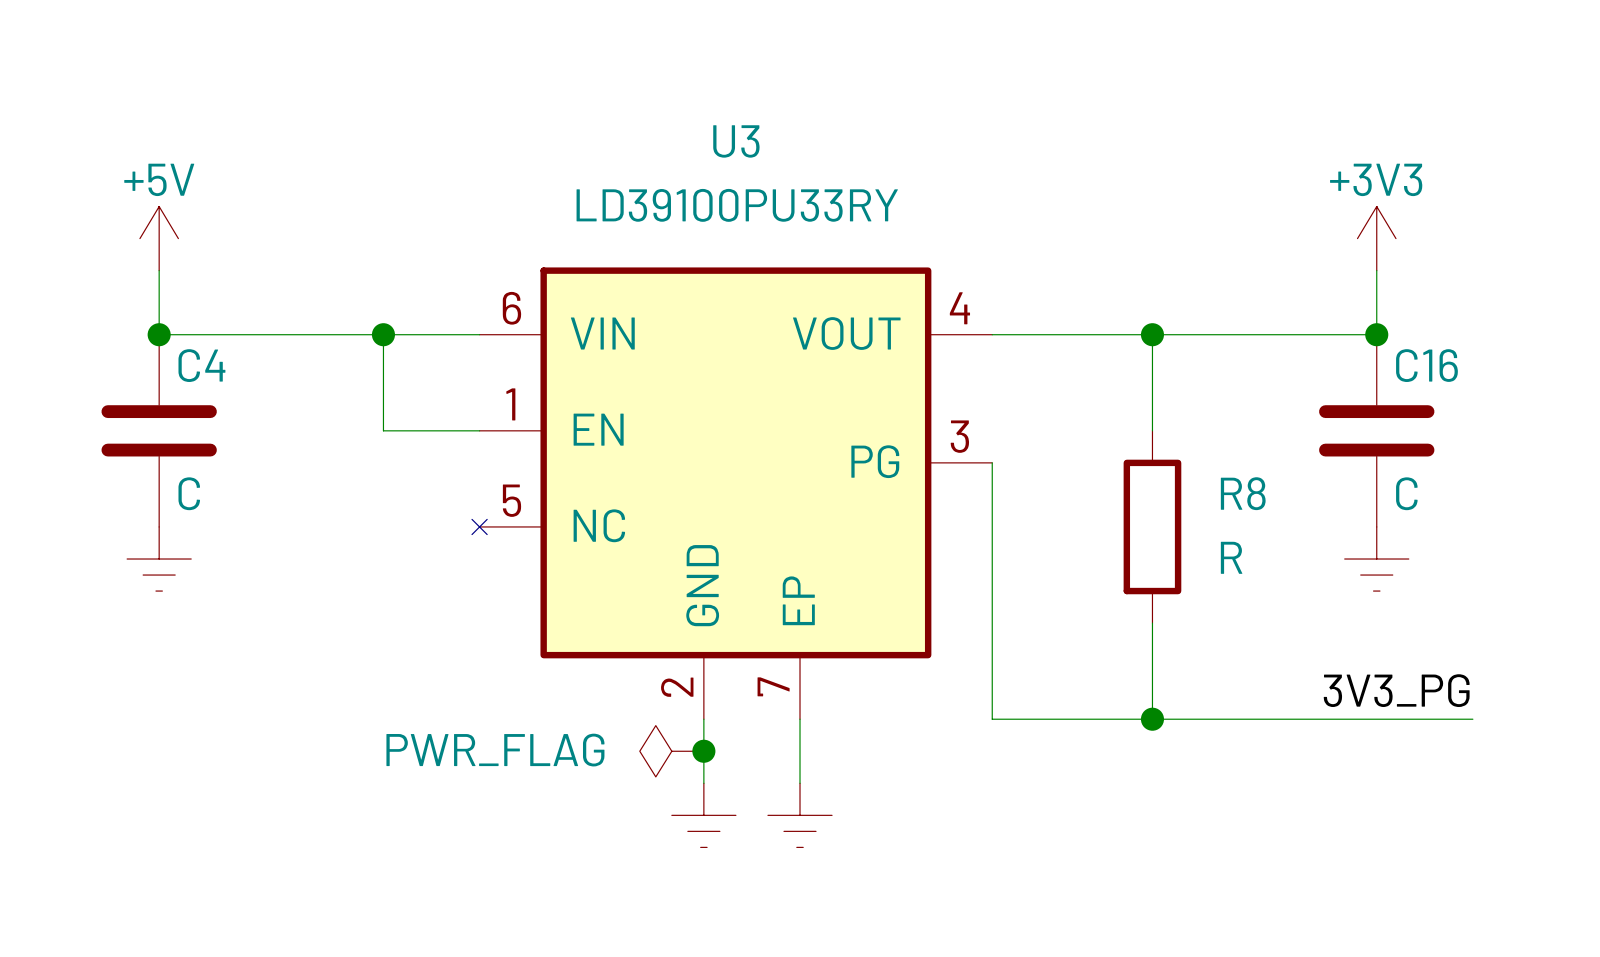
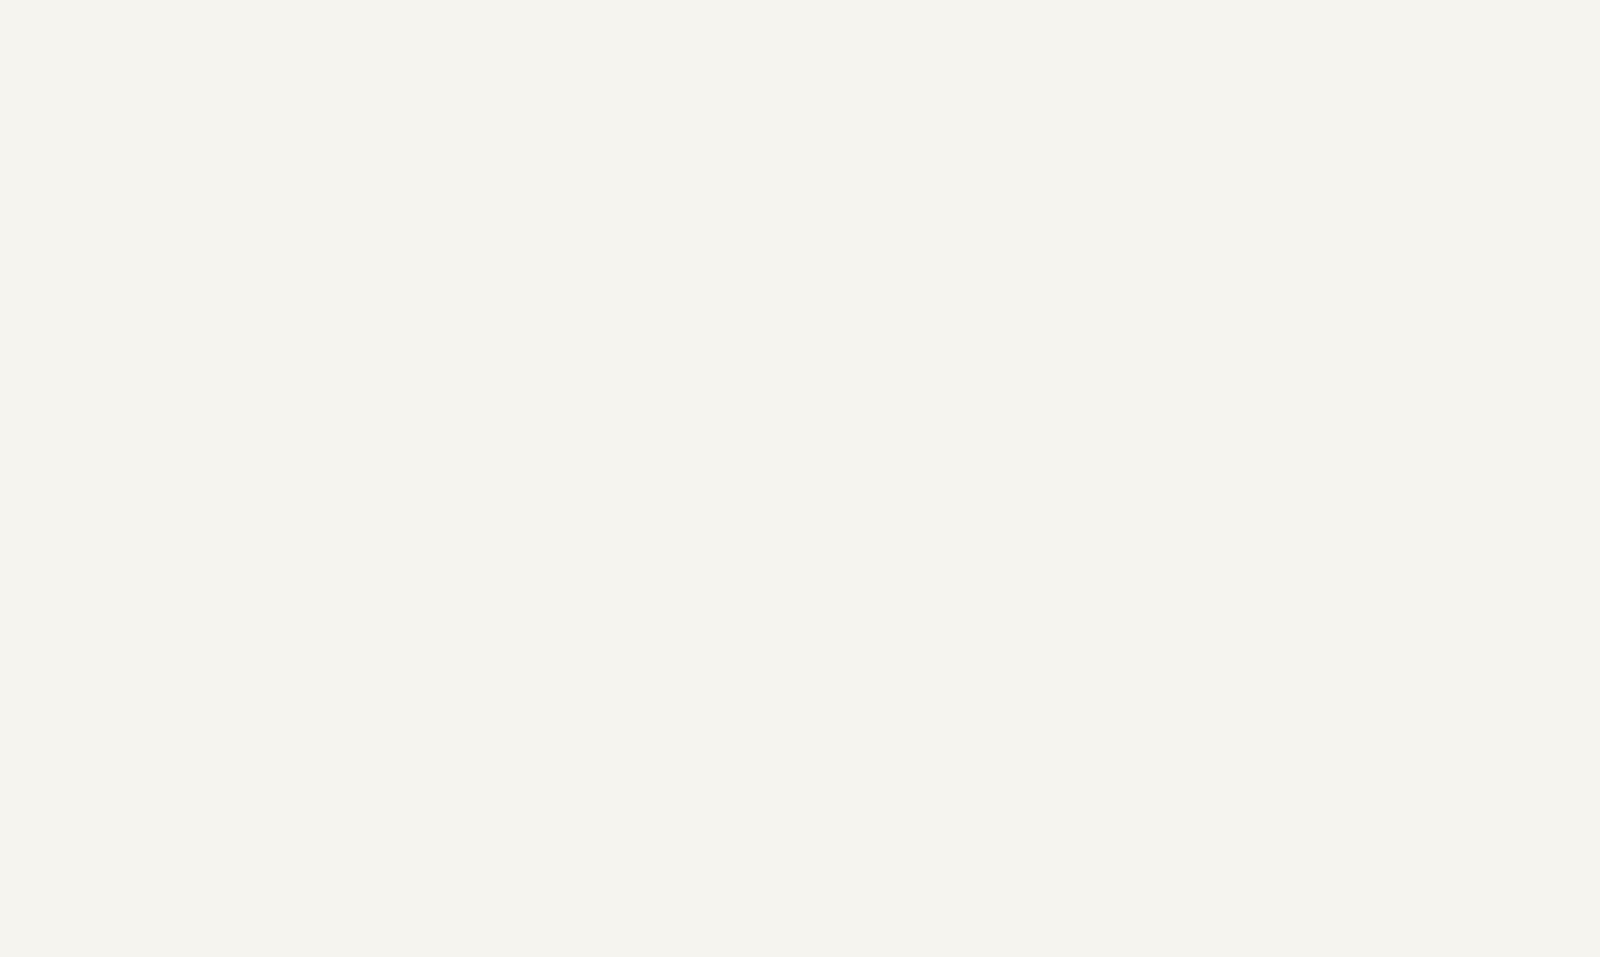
power symbol: +5V (159, 238) -> none
power symbol: +3V3 (1376, 238) -> none
wire: (159, 270) (159, 334) (479, 334) -> none
wire: (1376, 270) (1376, 334) (992, 334) -> none
junction: (159, 334) -> none
wire: (383, 334) (383, 430) (479, 430) -> none
junction: (383, 334) -> none
wire: (1152, 334) (1152, 430) -> none
junction: (1152, 334) -> none
junction: (1376, 334) -> none
C4: C (159, 430) -> none
C16: C (1376, 430) -> none
wire: (992, 462) (992, 719) (1472, 719) -> none
U3: LD39100PU33RY (732, 493) -> none
R8: R (1152, 526) -> none
power symbol: (159, 559) -> none
power symbol: (1376, 559) -> none
wire: (1152, 623) (1152, 719) -> none
label: 3V3_PG (1396, 690) -> none
wire: (703, 719) (703, 783) -> none
wire: (800, 719) (800, 783) -> none
junction: (1152, 719) -> none
power symbol: PWR_FLAG (671, 751) -> none
junction: (703, 751) -> none
power symbol: (703, 815) -> none
power symbol: (800, 815) -> none

